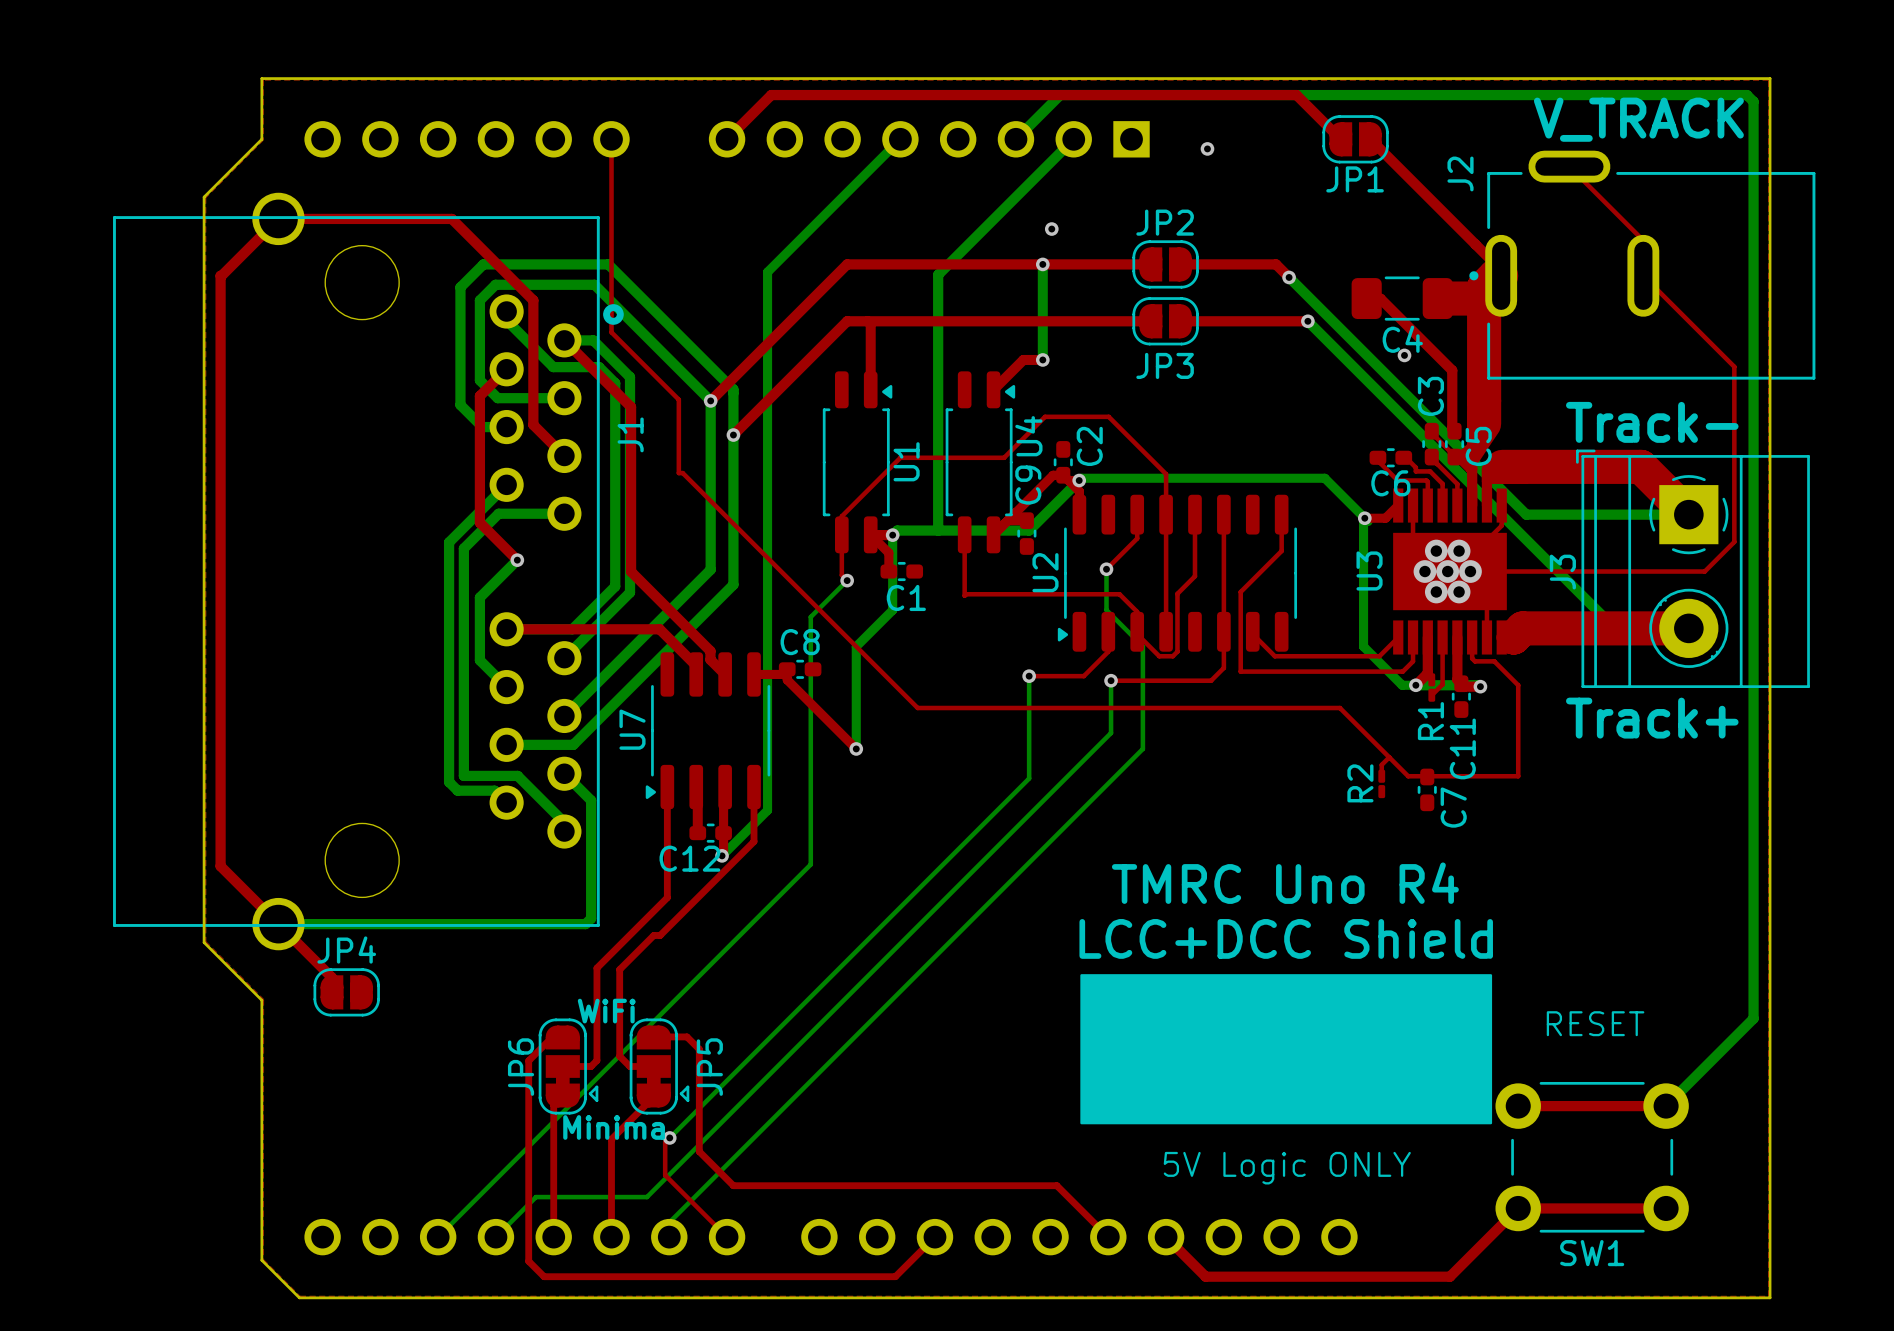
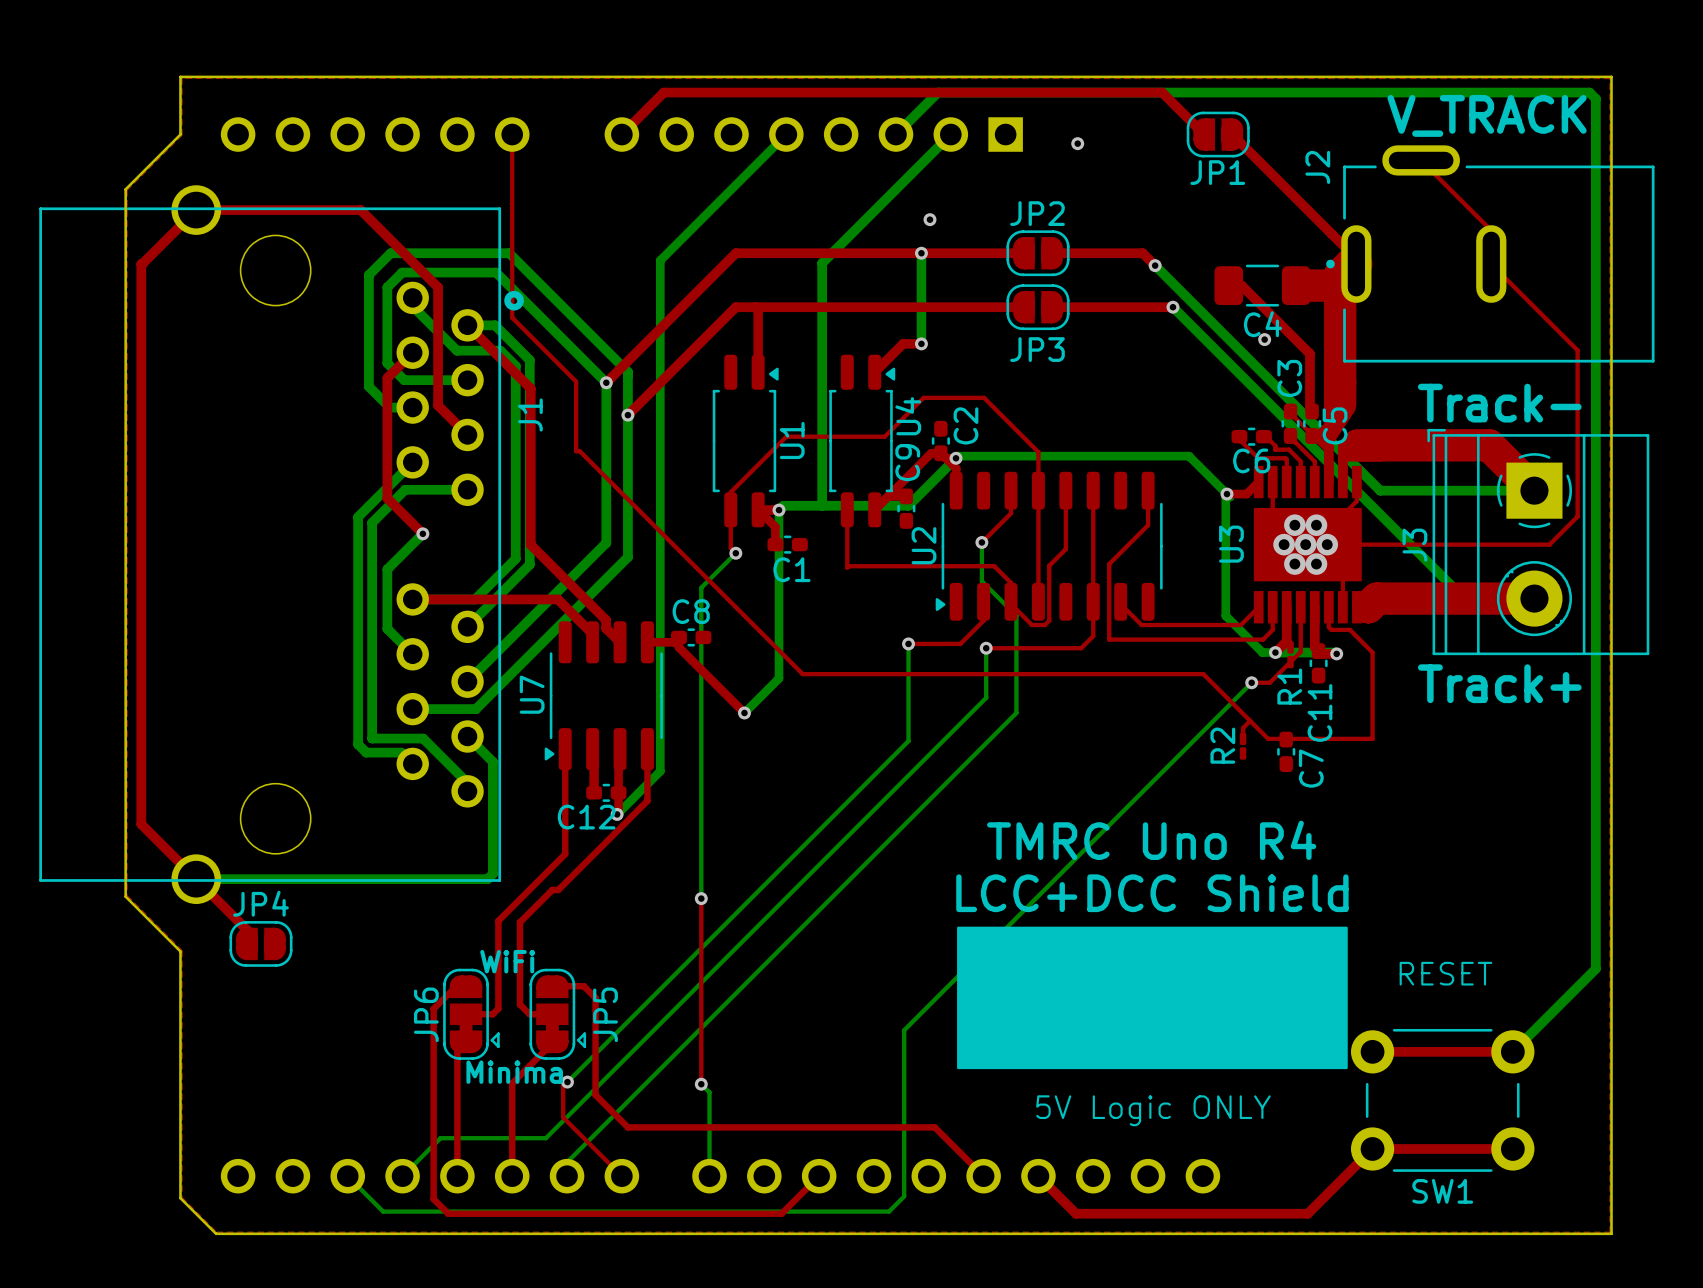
bottom track: (892, 610) (856, 646) (856, 748) -> (779, 581) (779, 678) (744, 712)
top track: none -> (1290, 661) (1269, 682) (1251, 682)
bottom track: none -> (1251, 682) (904, 1030) (904, 1196) (889, 1211) (383, 1211) (347, 1176)
via: none -> (1251, 682)
bottom track: (810, 864) (438, 1237) -> (701, 822) (701, 898)
top track: none -> (701, 898) (701, 1084)
via: none -> (701, 898)
bottom track: none -> (701, 1084) (709, 1092) (709, 1176)
via: none -> (701, 1084)

